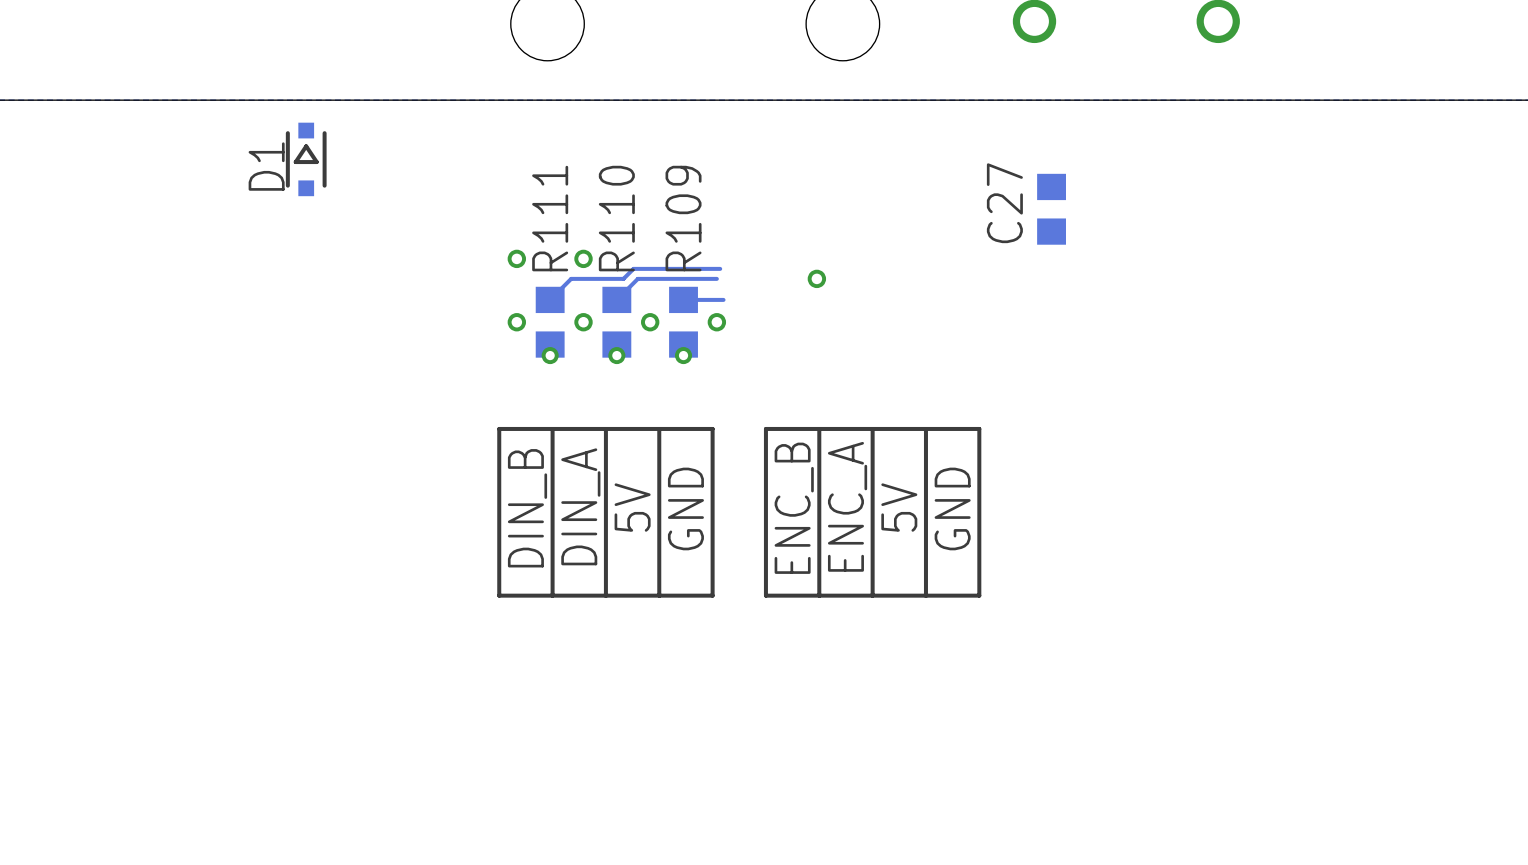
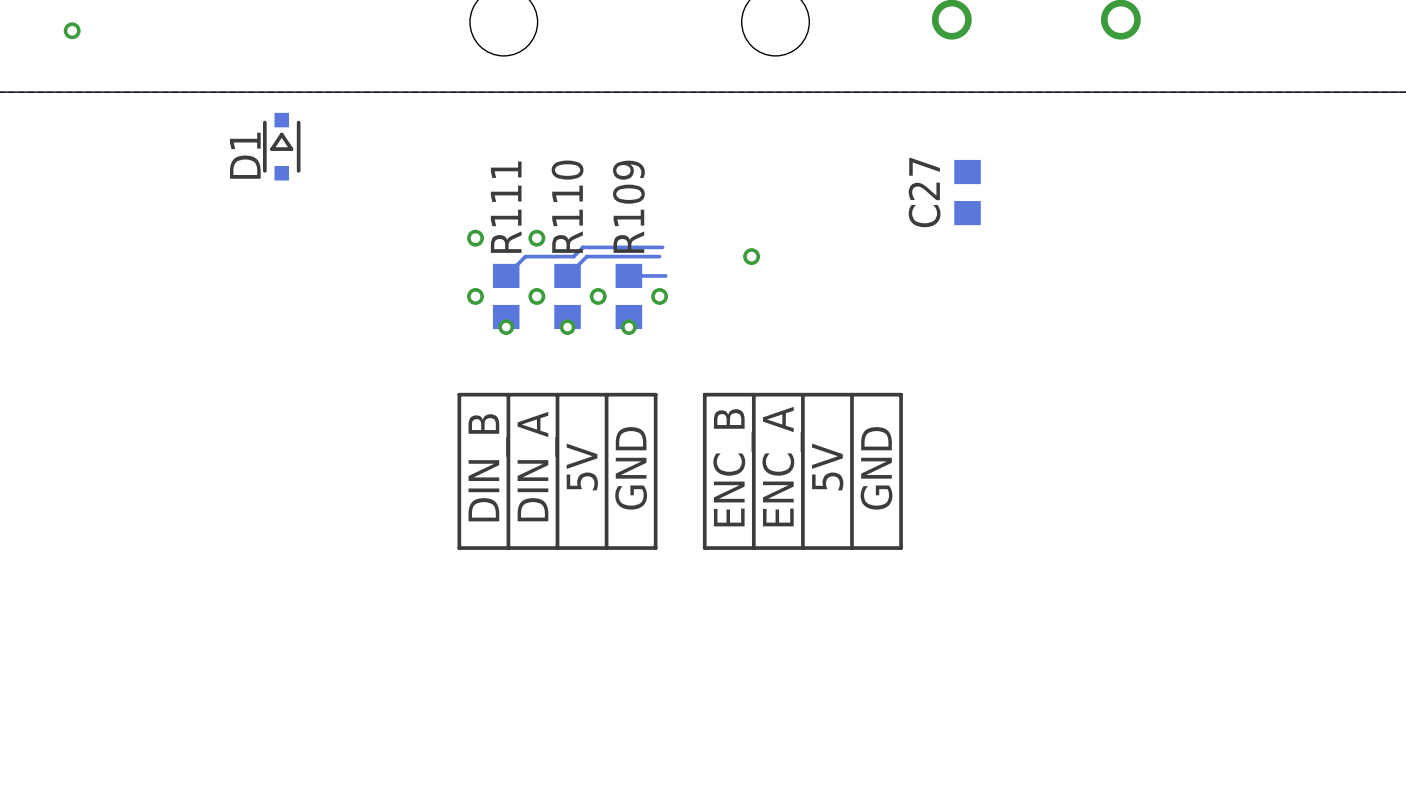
via: none -> (72, 30)

